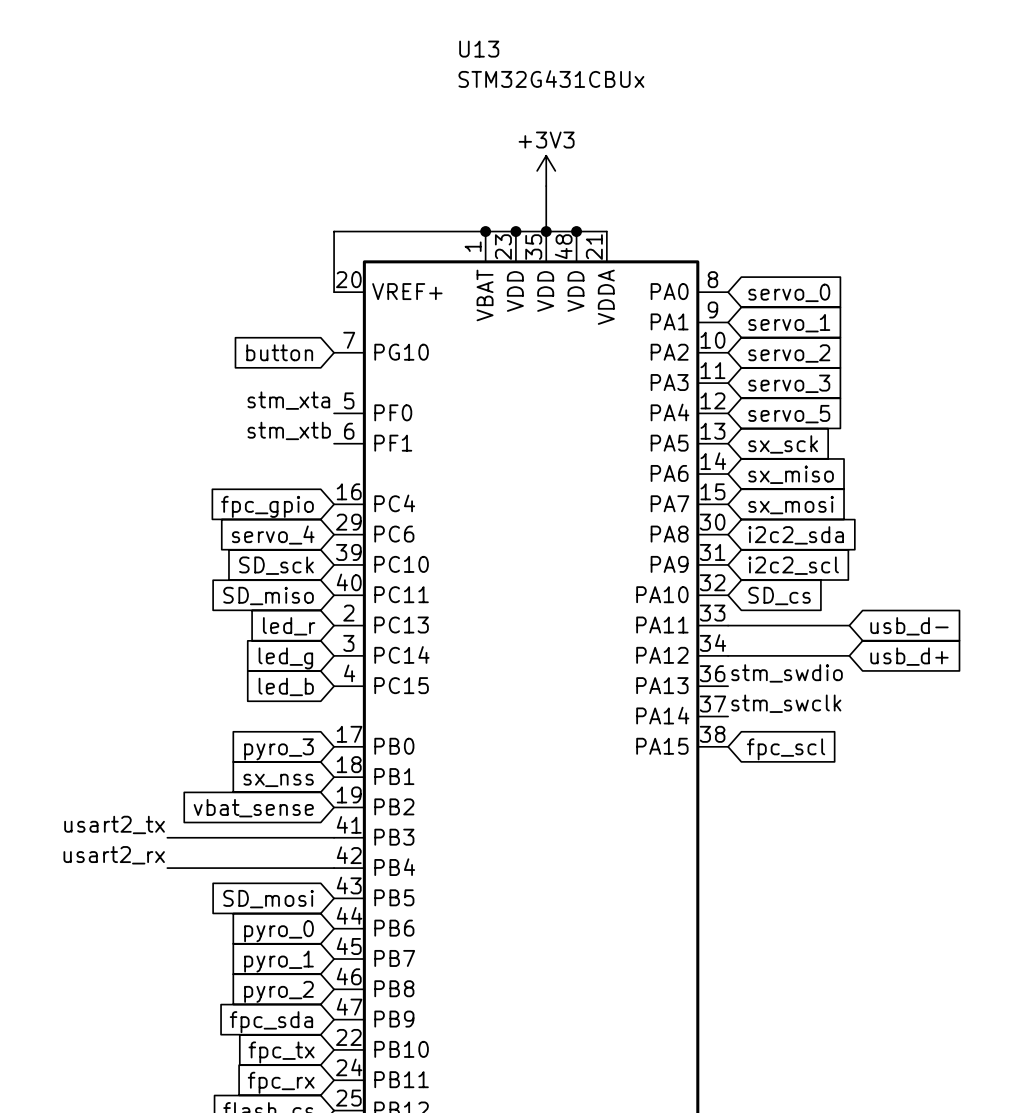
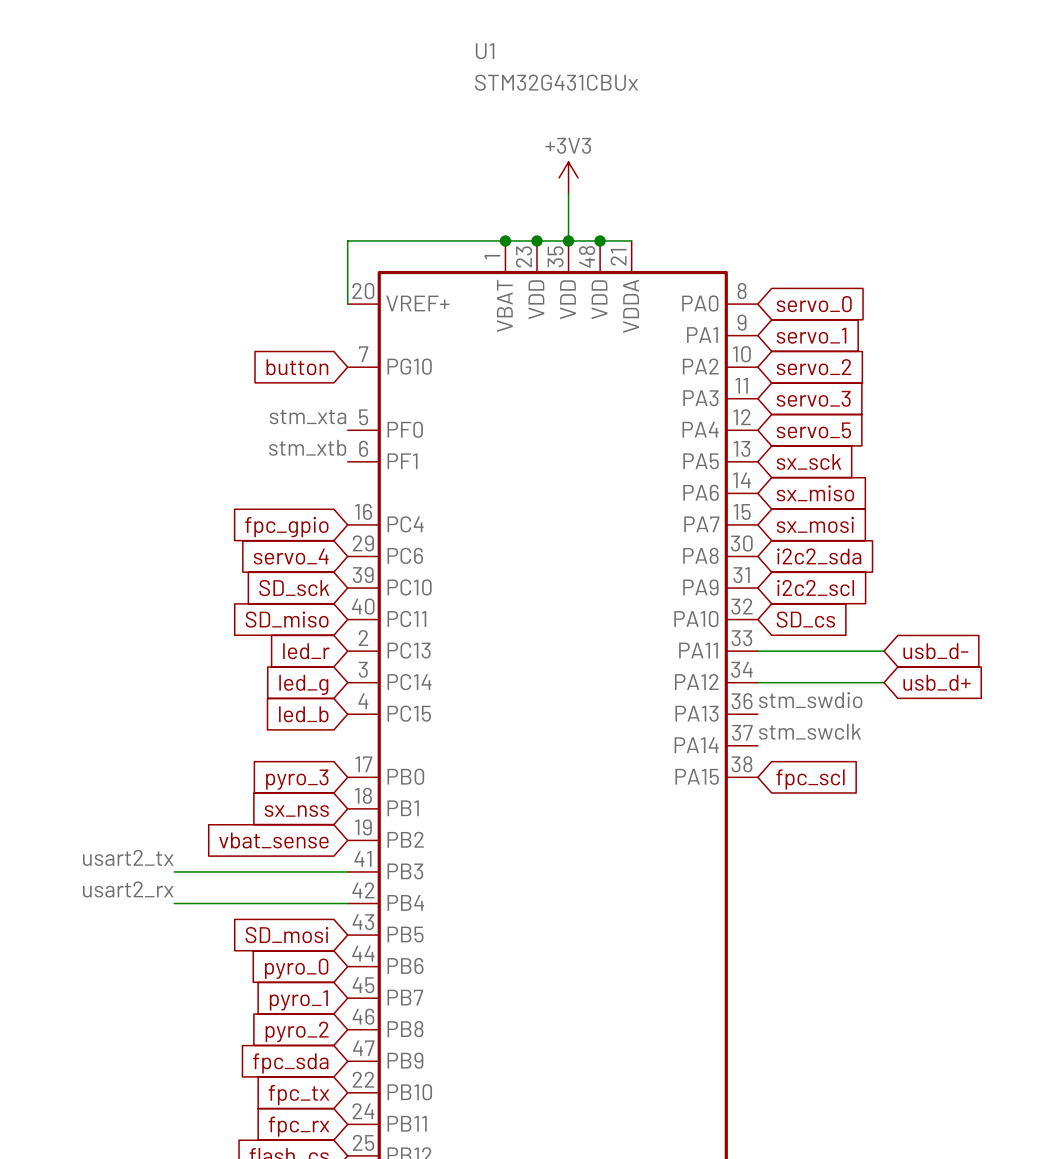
U13 name: U13 (479, 49) -> U1 (485, 51)

